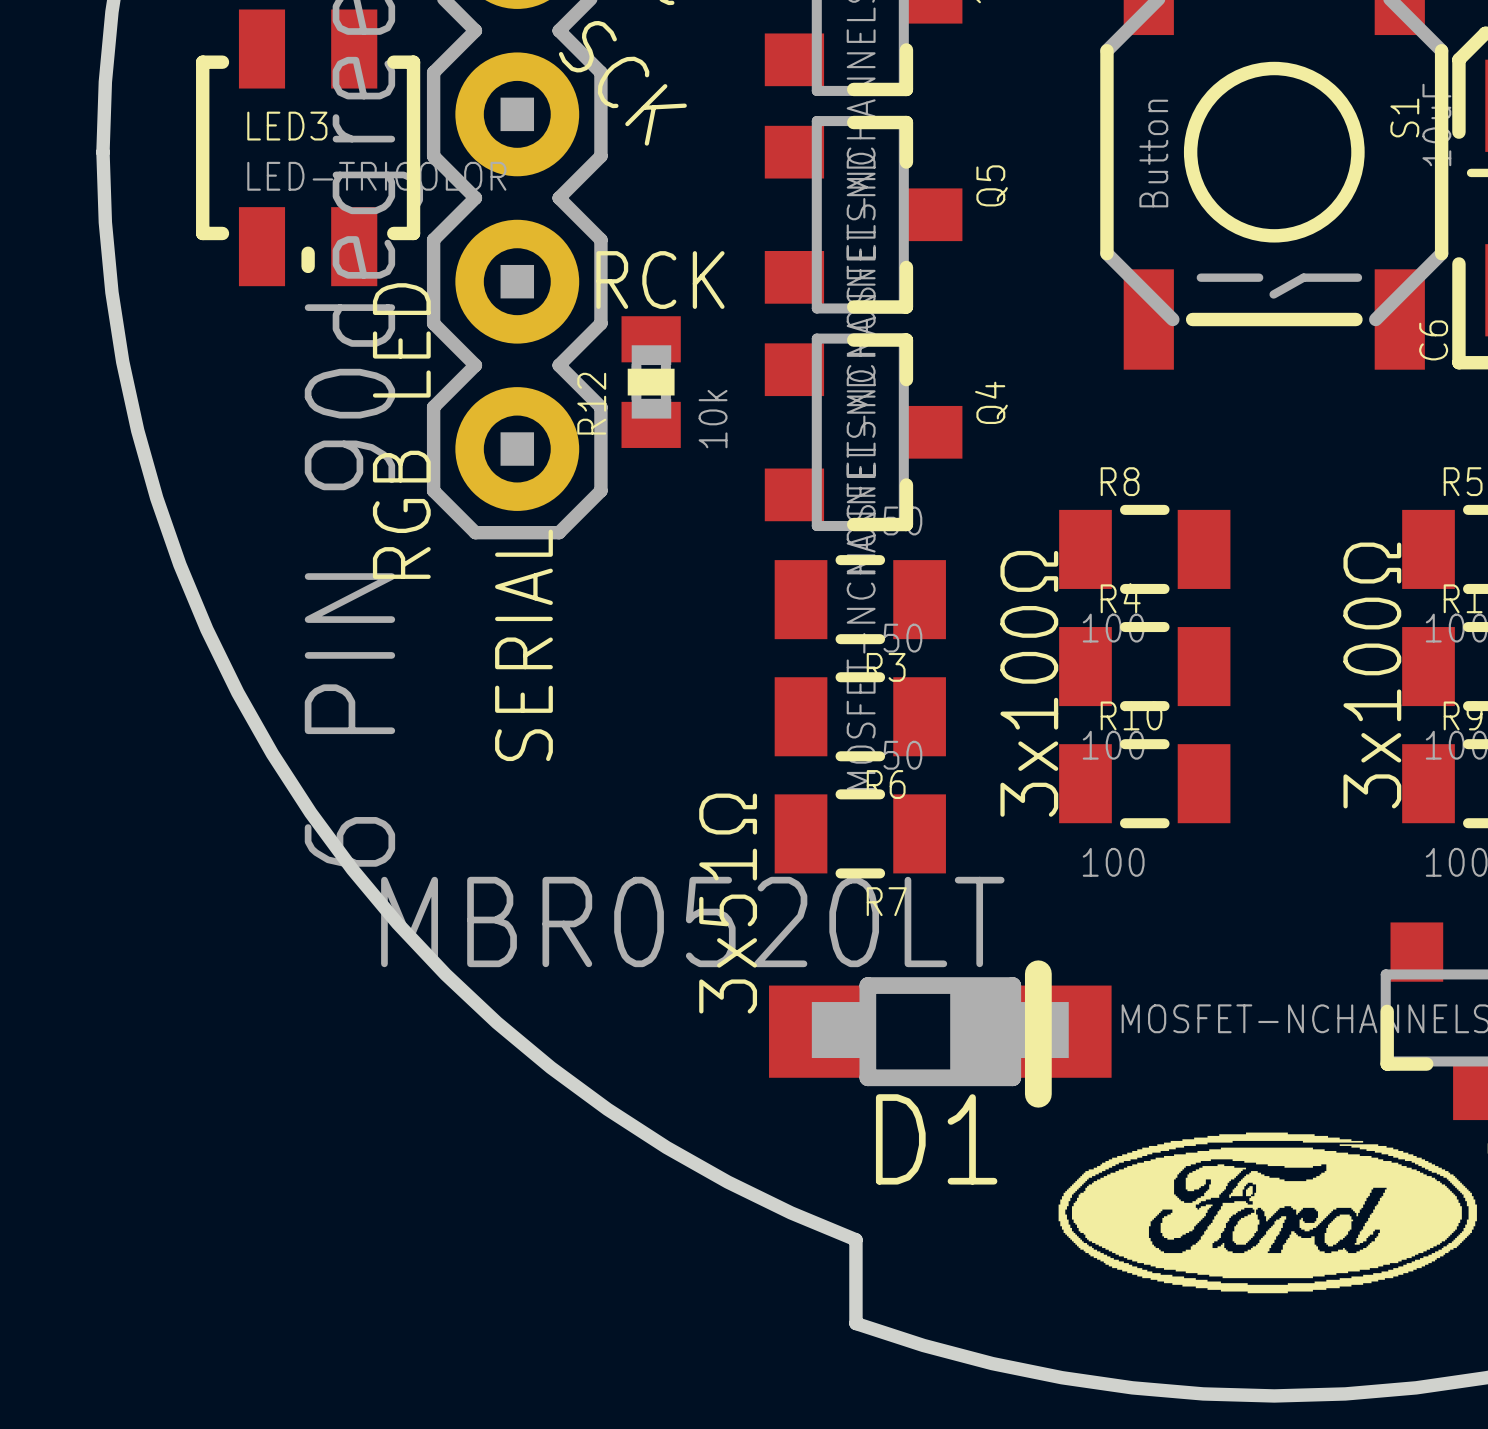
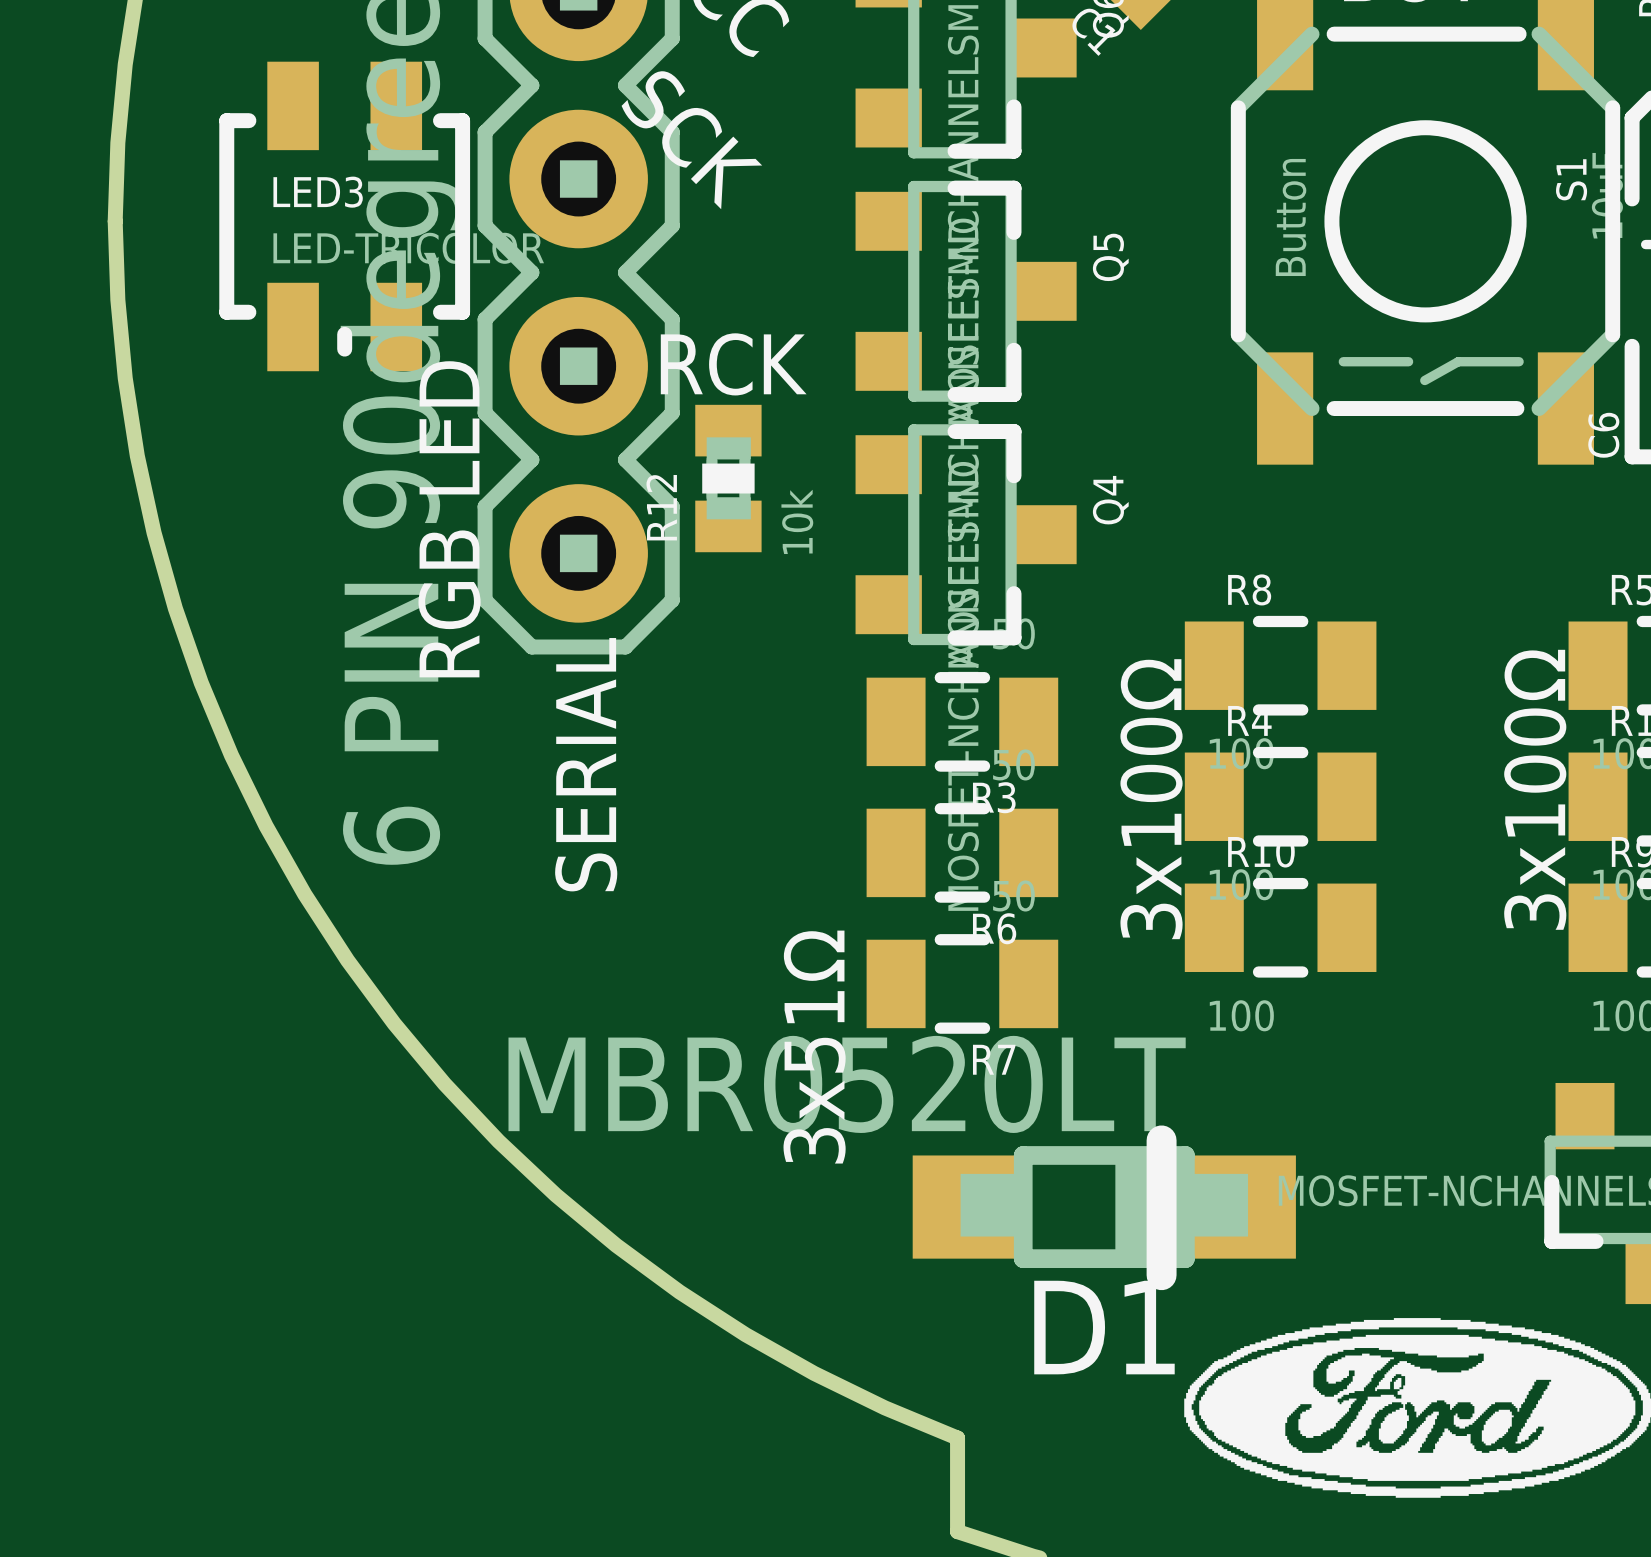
D1 position: (940, 1031) -> (1104, 1207)
drawing: none -> [1485, 1329, 1535, 1332]

